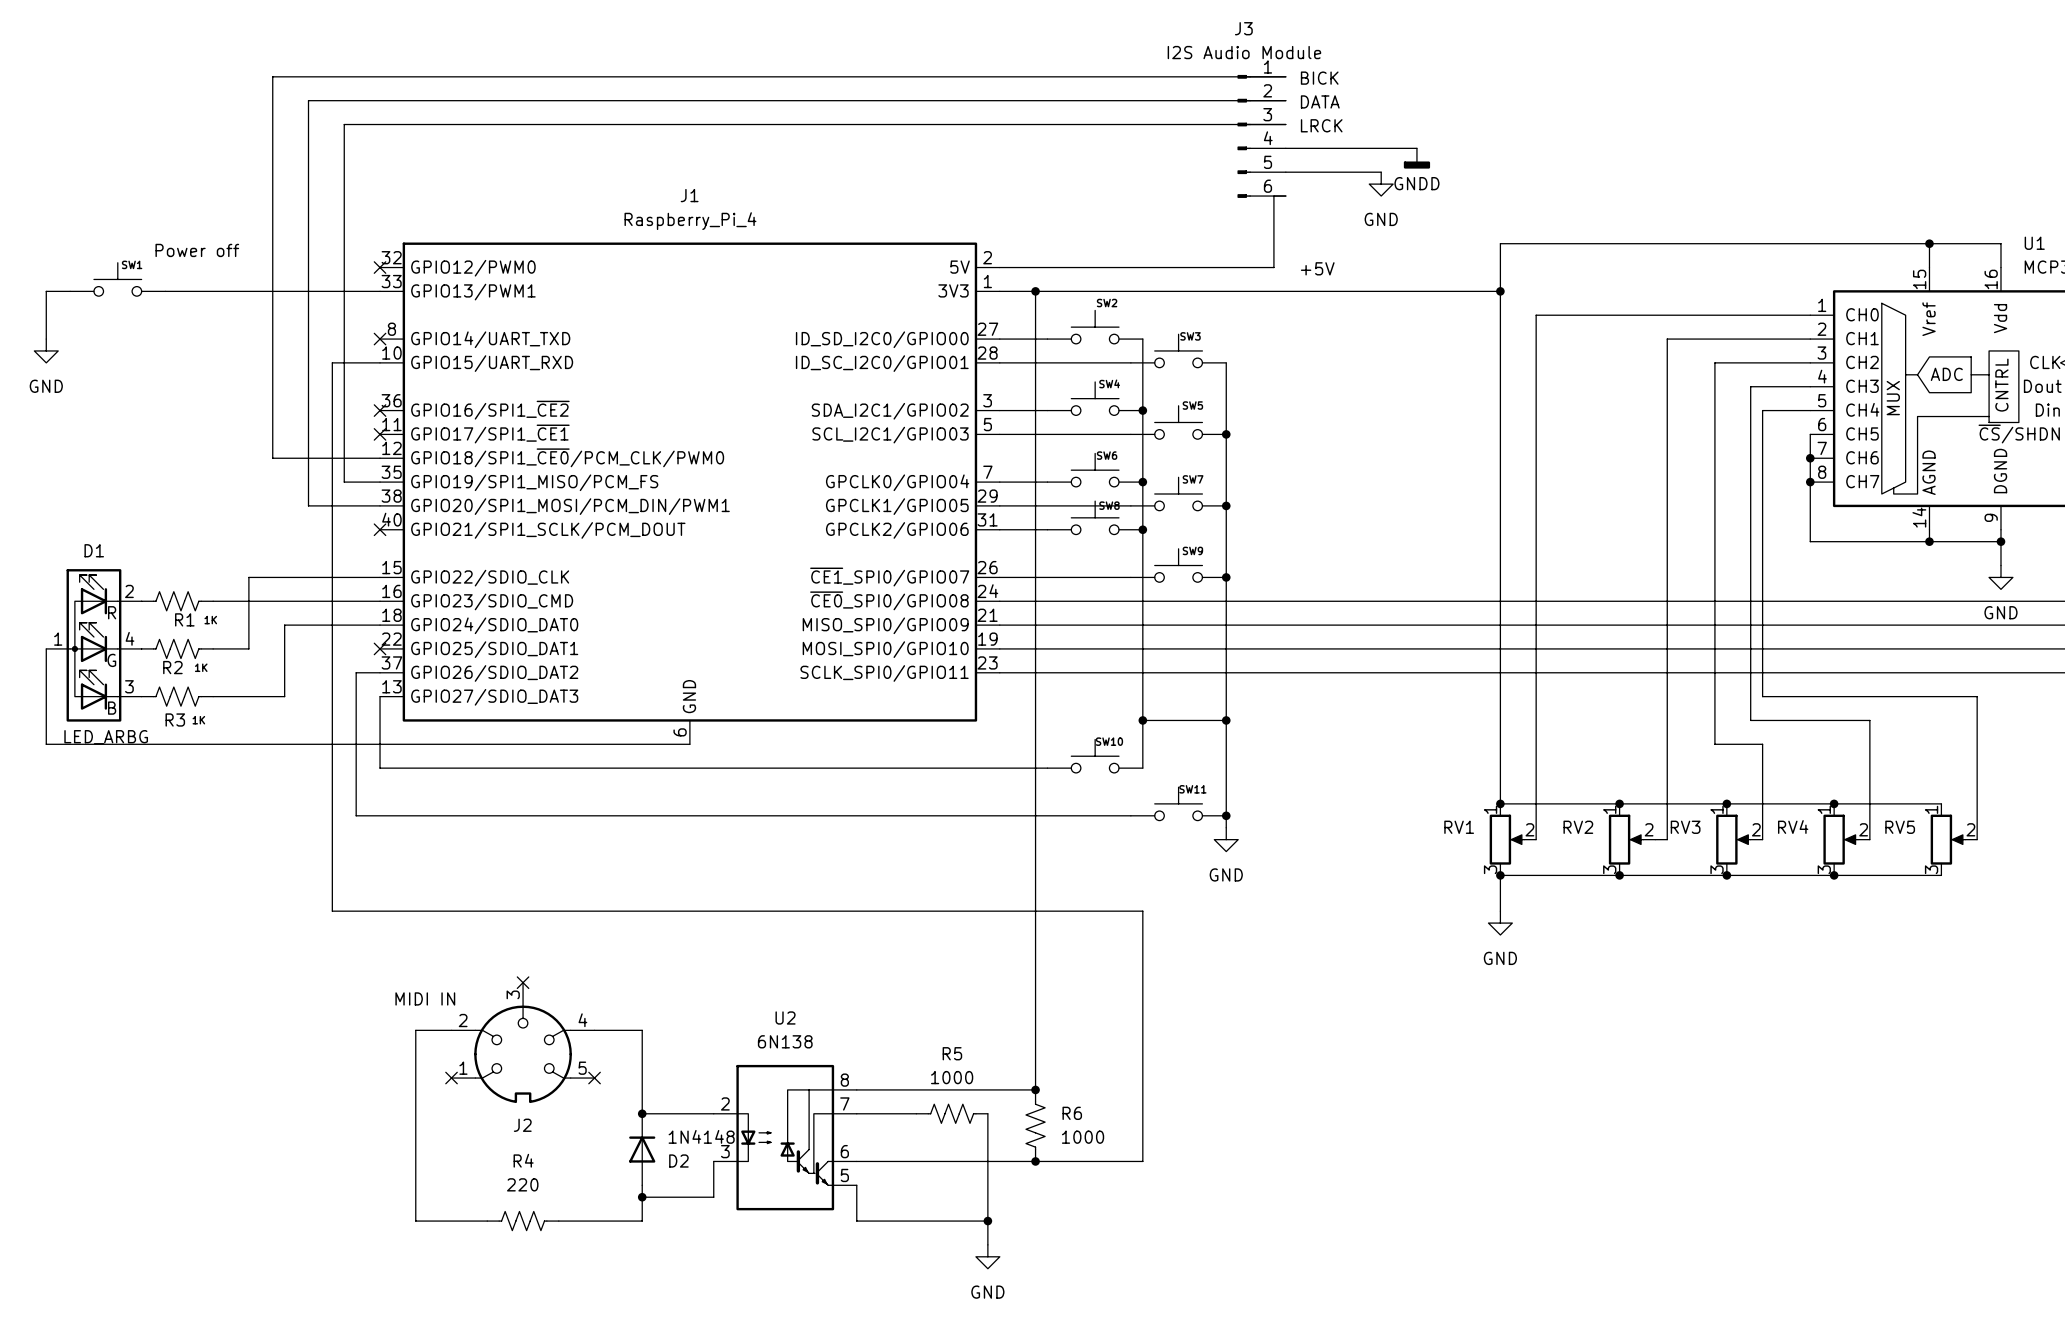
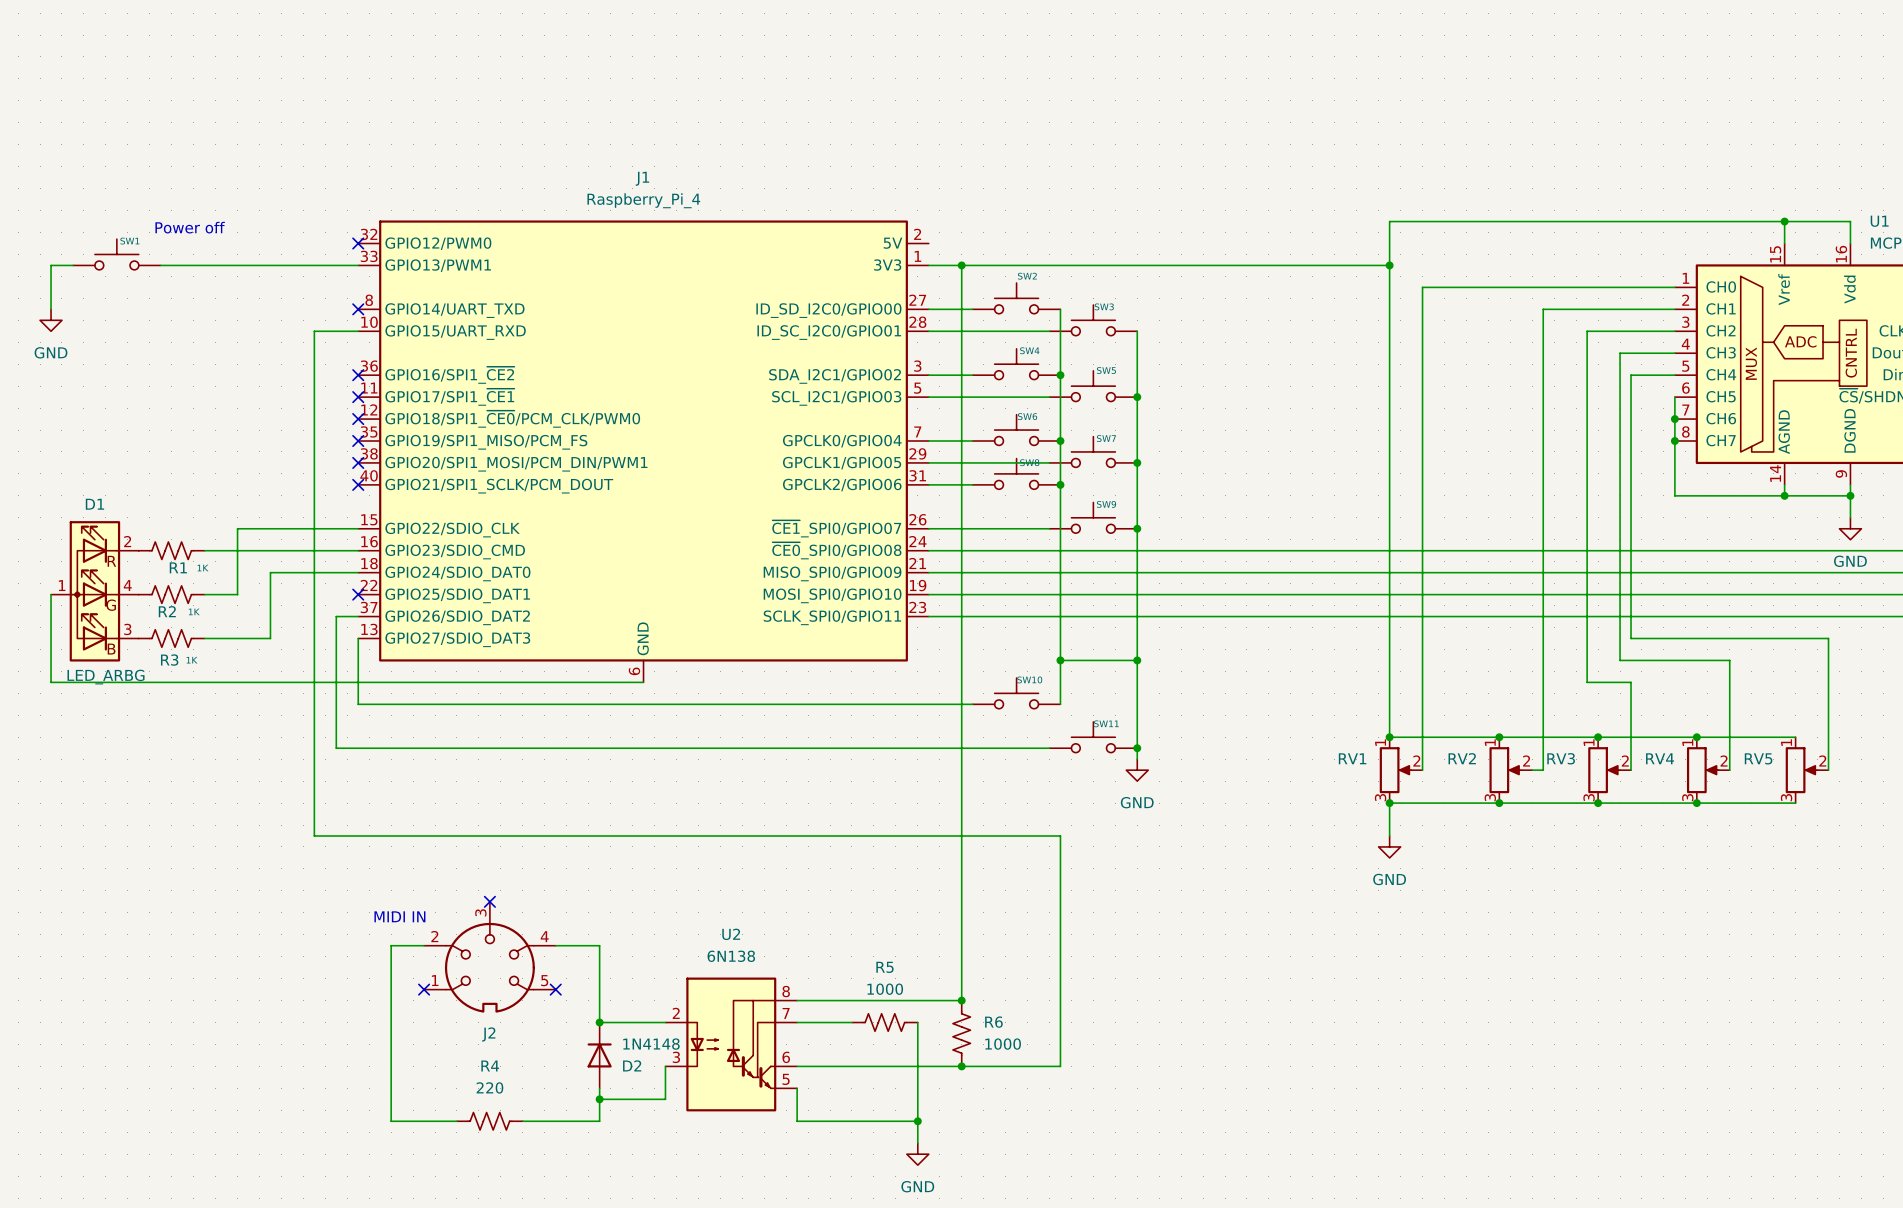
bus: (1285, 76) (272, 76) (272, 458) (380, 458) -> none
label: BICK (1319, 78) -> none
wire: (1285, 100) (308, 100) (308, 505) (380, 505) -> none
label: DATA (1320, 101) -> none
wire: (1285, 124) (344, 124) (344, 482) (380, 482) -> none
label: LRCK (1321, 125) -> none
J3: I2S Audio Module (1261, 136) -> none
wire: (1285, 148) (1416, 148) -> none
power symbol: GNDD (1416, 158) -> none
wire: (1285, 172) (1381, 172) -> none
power symbol: GND (1381, 184) -> none
wire: (1285, 196) (1273, 196) (1273, 267) (999, 267) -> none
label: +5V (1317, 268) -> none
no-connect mark: none -> (358, 419)
no-connect mark: none -> (358, 441)
no-connect mark: none -> (358, 462)

